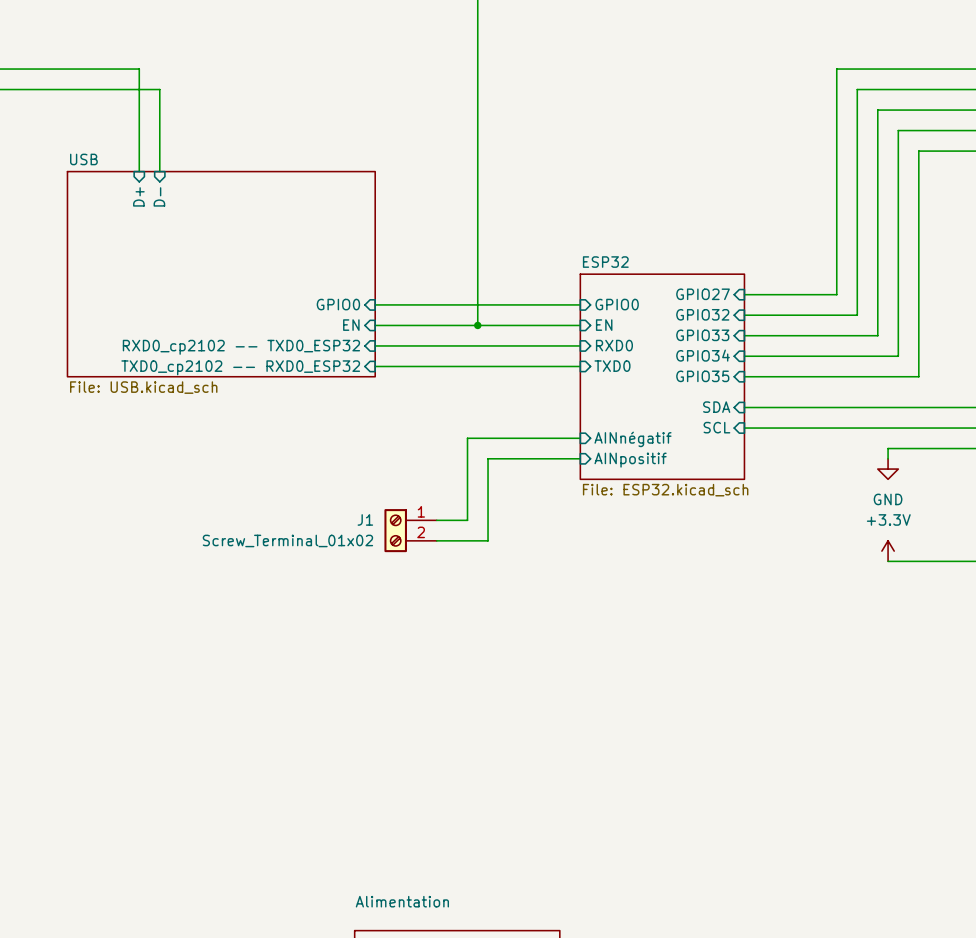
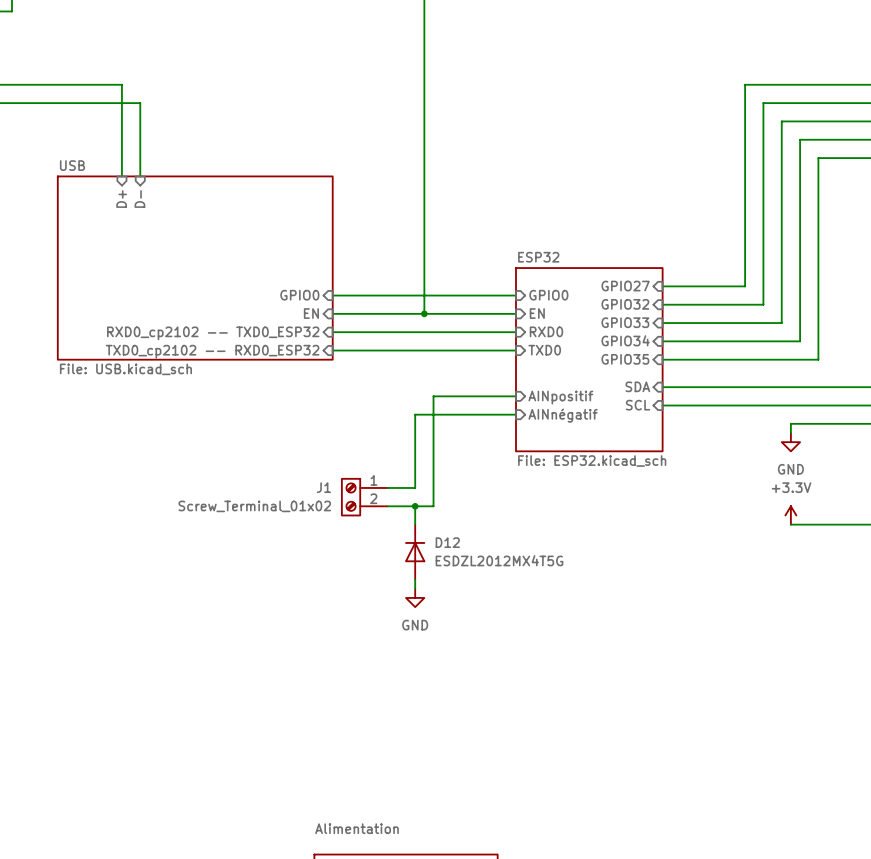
wire: (488, 458) (580, 458) -> (433, 433) (433, 396) (515, 396)
sheet pin position: AINpositif (630, 460) -> AINpositif (560, 397)
wire: none -> (415, 506) (415, 524)
junction: none -> (415, 506)
D12: none -> ESDZL2012MX4T5G (415, 552)
wire: none -> (415, 579) (415, 588)
power symbol: none -> GND (415, 597)

